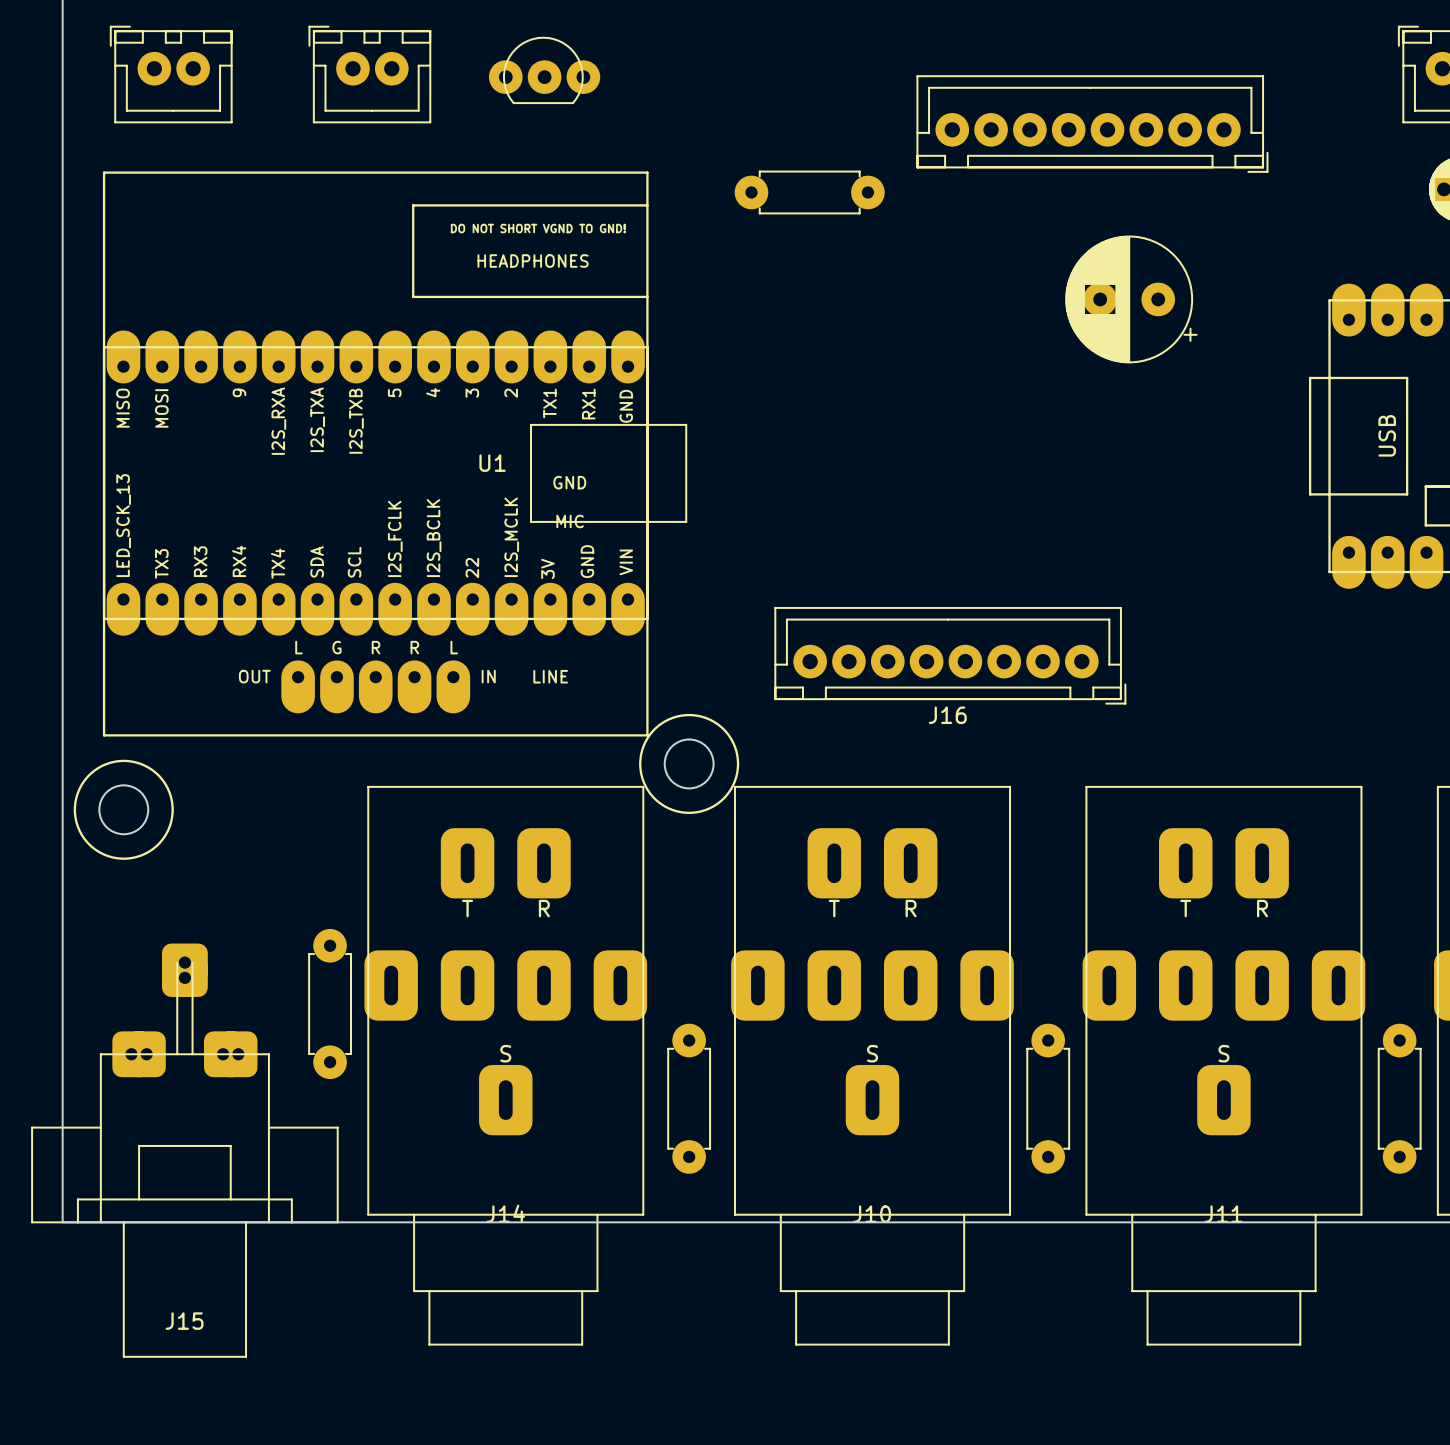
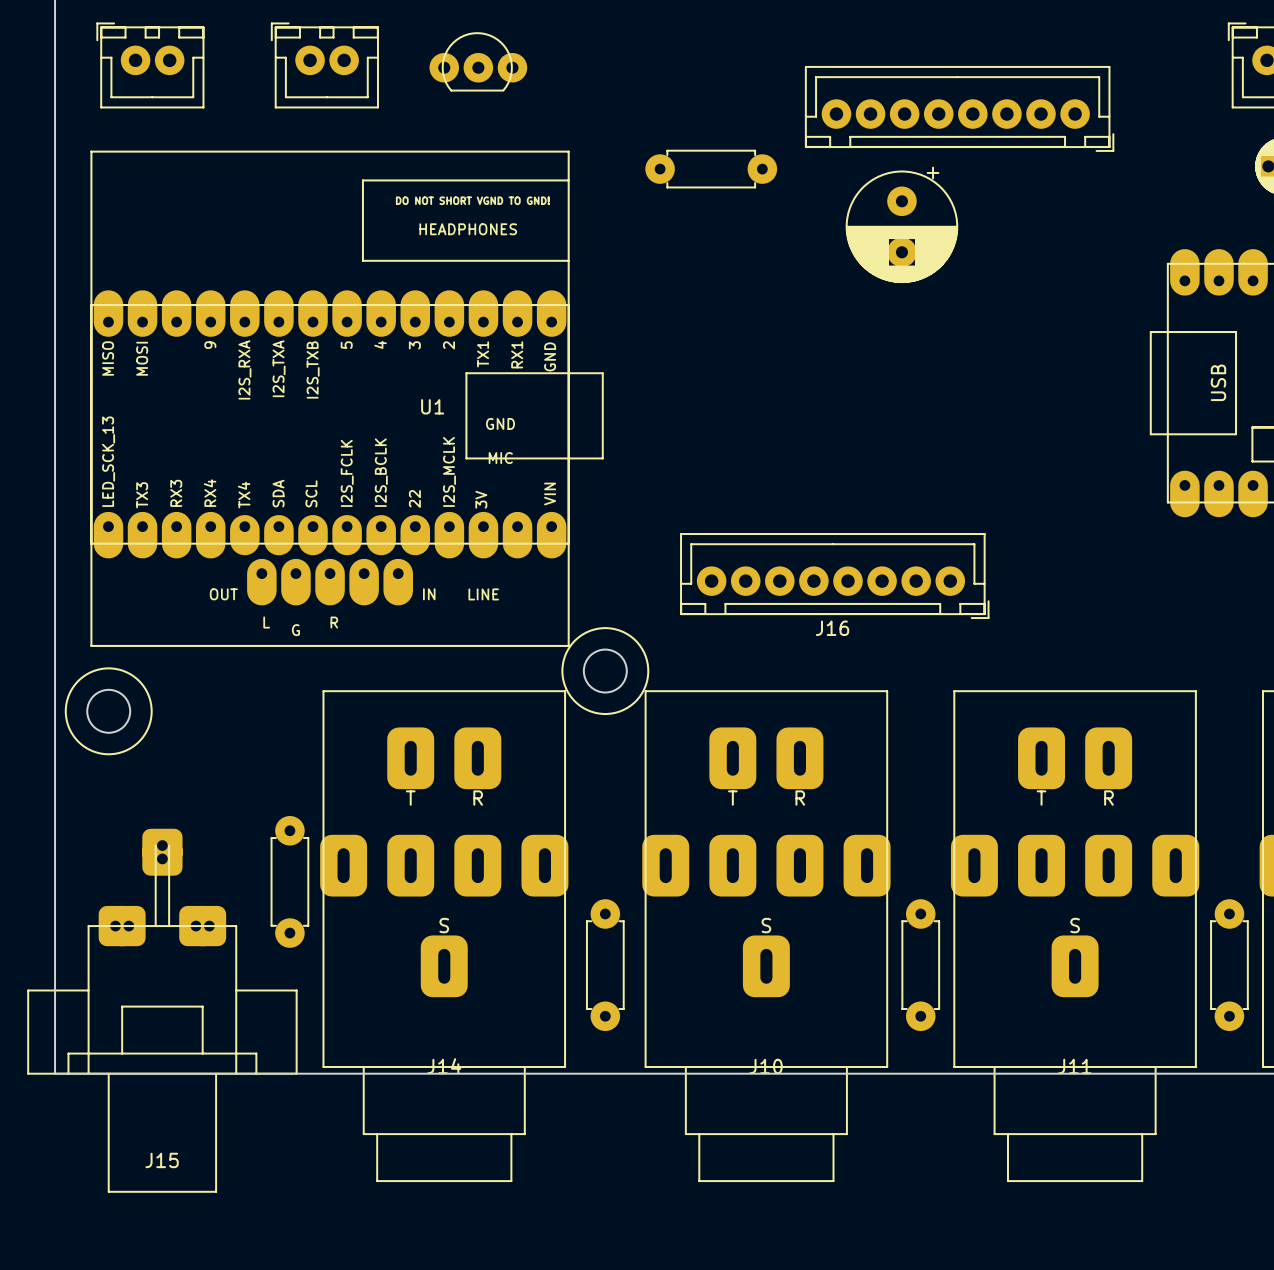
U1 footprint: [102, 171, 688, 737] -> [90, 150, 604, 647]
part rotation: 0° (1131, 299) -> 90° counterclockwise (901, 224)
part position: (1131, 299) -> (901, 224)

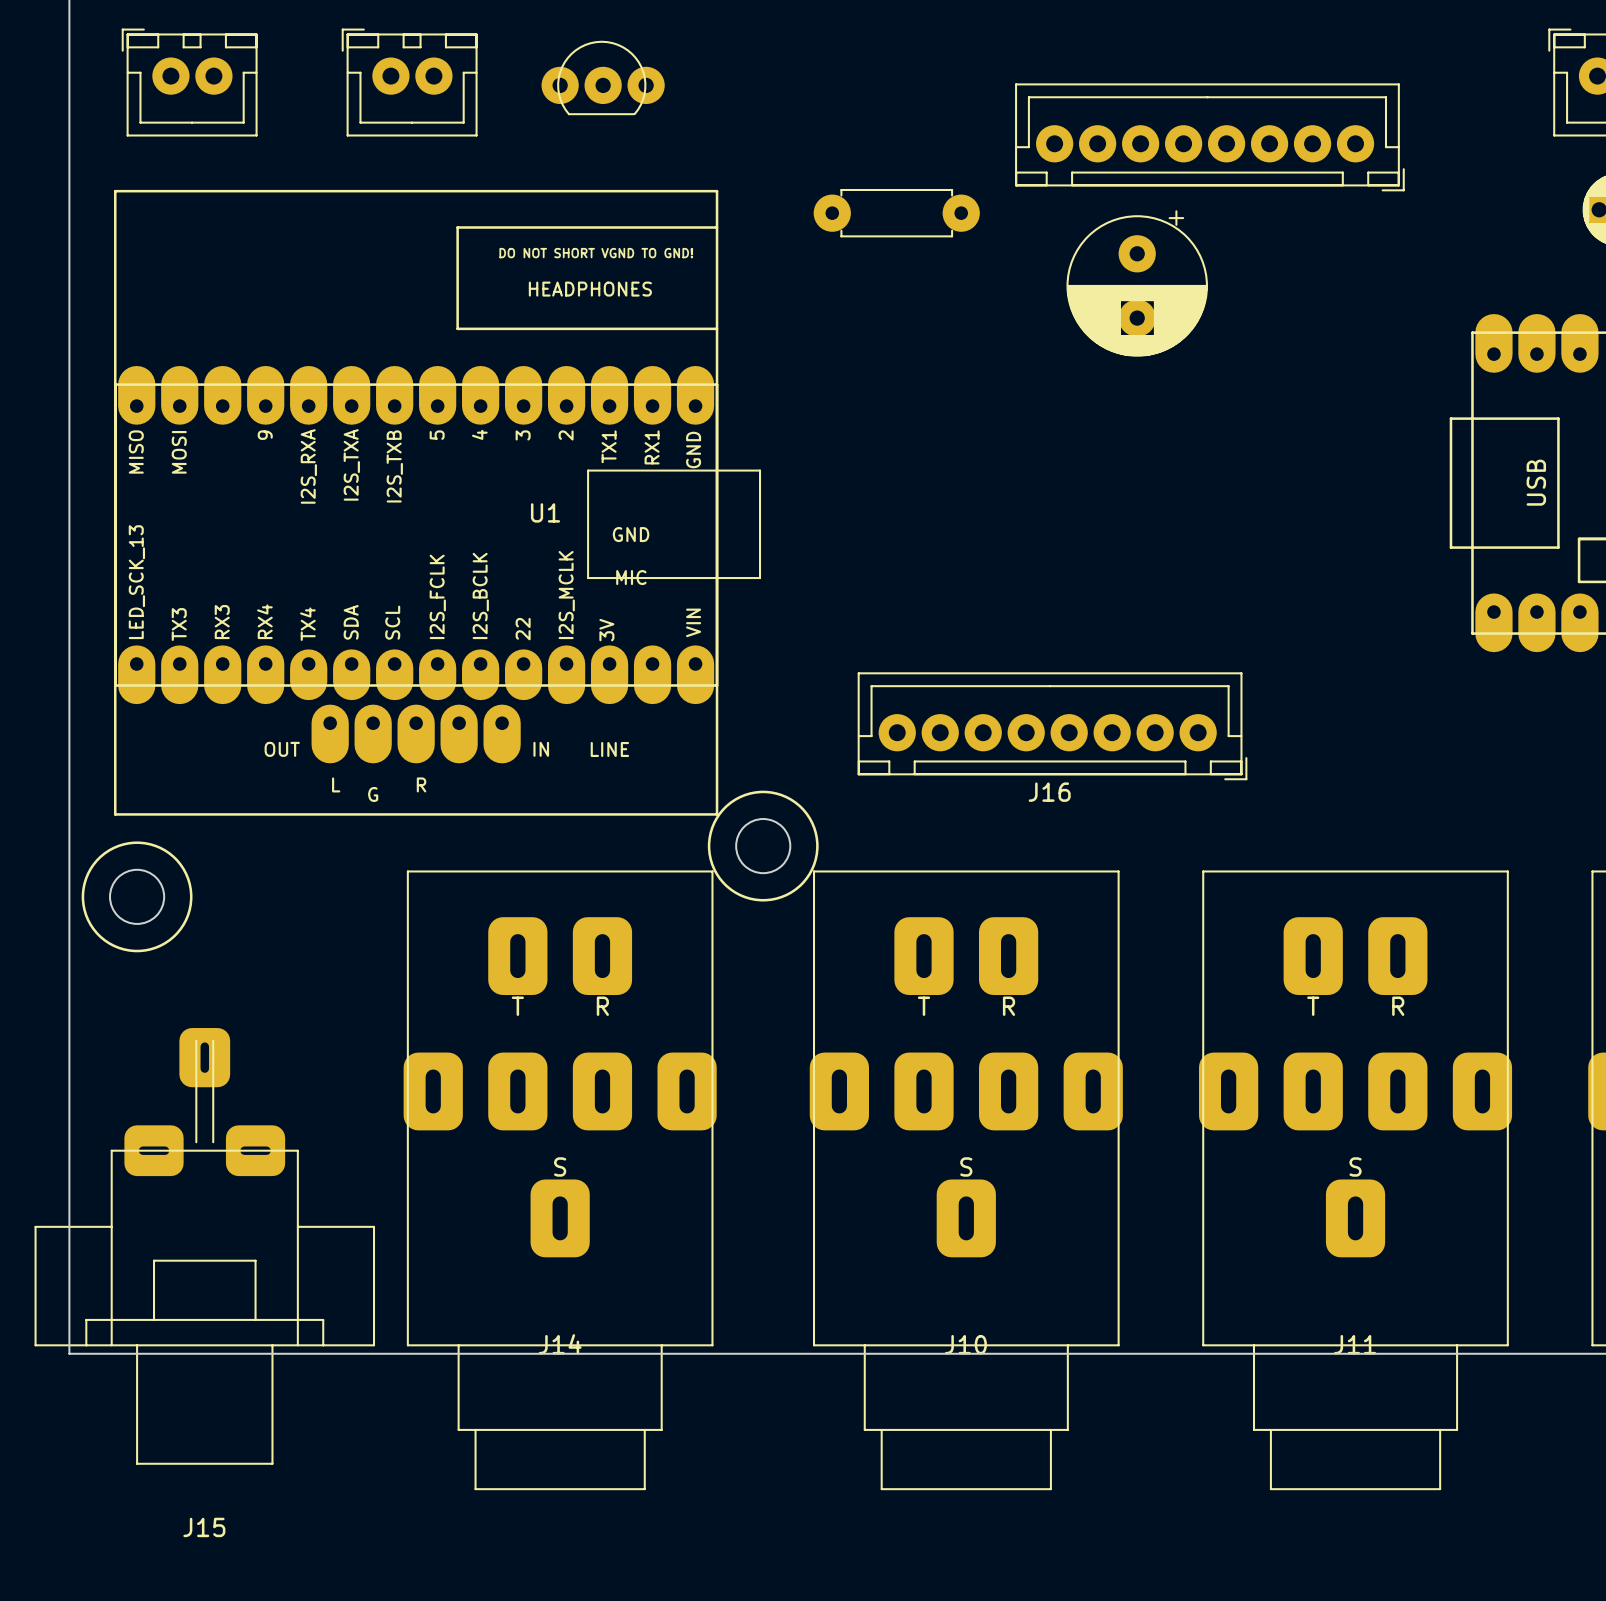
J15 footprint: [27, 828, 298, 1193] -> [34, 1028, 376, 1465]
part: (289, 881) -> none
part: (605, 965) -> none
part: (920, 965) -> none
part: (1229, 965) -> none
J15 name position: J15 (162, 1160) -> J15 (204, 1527)

